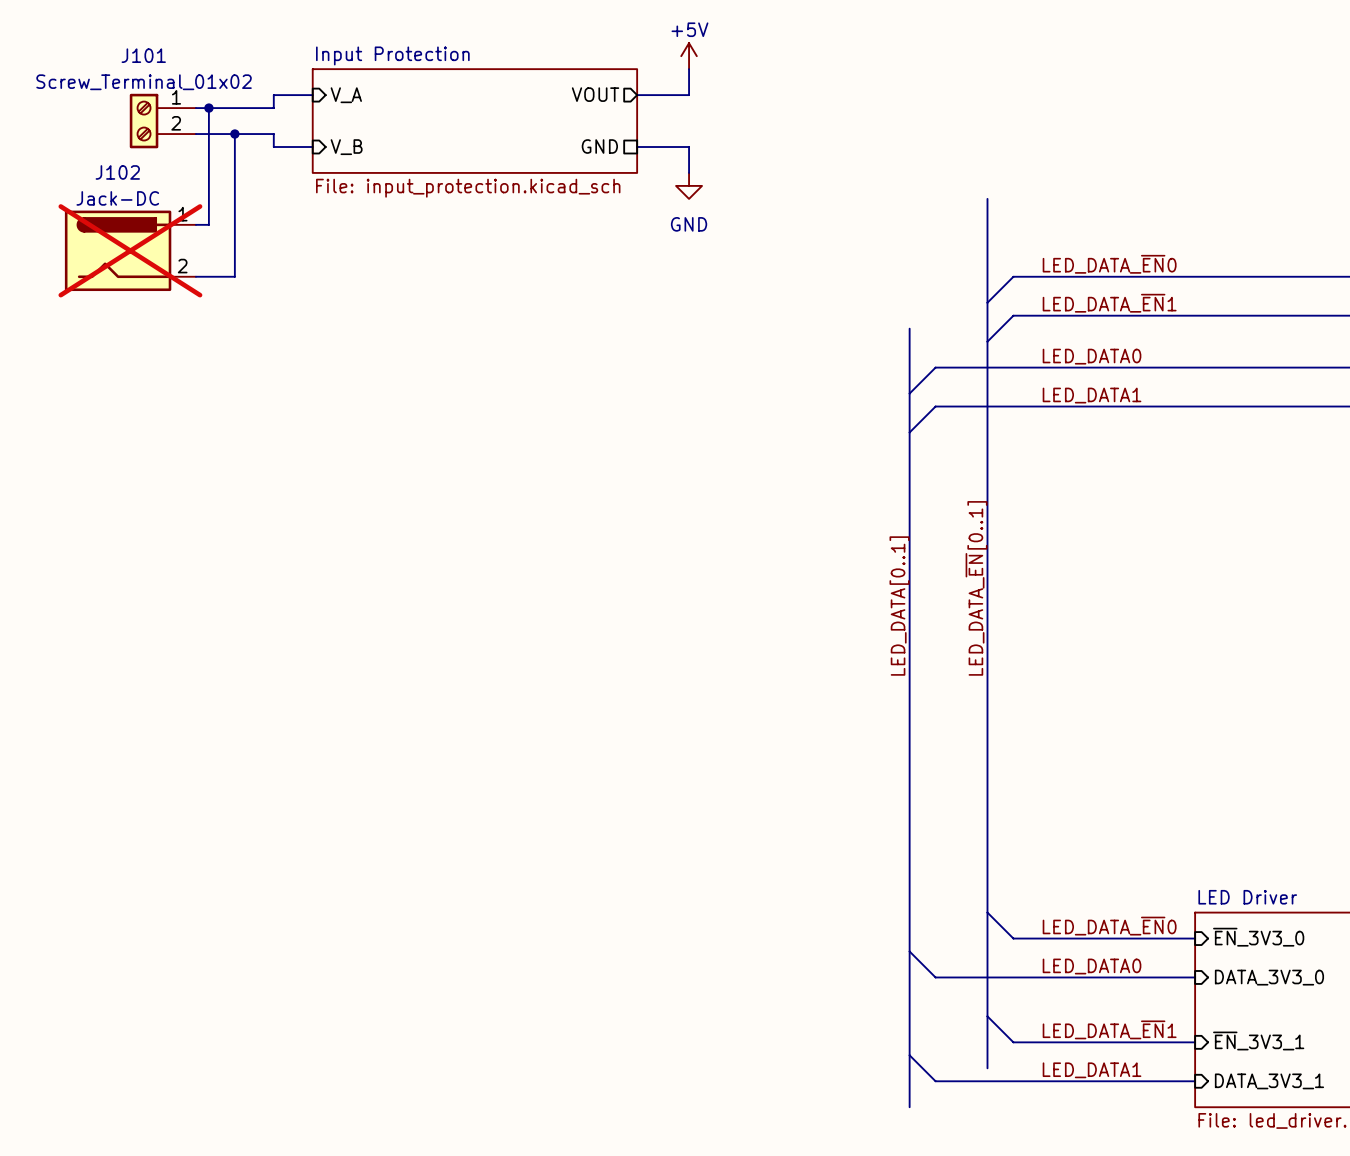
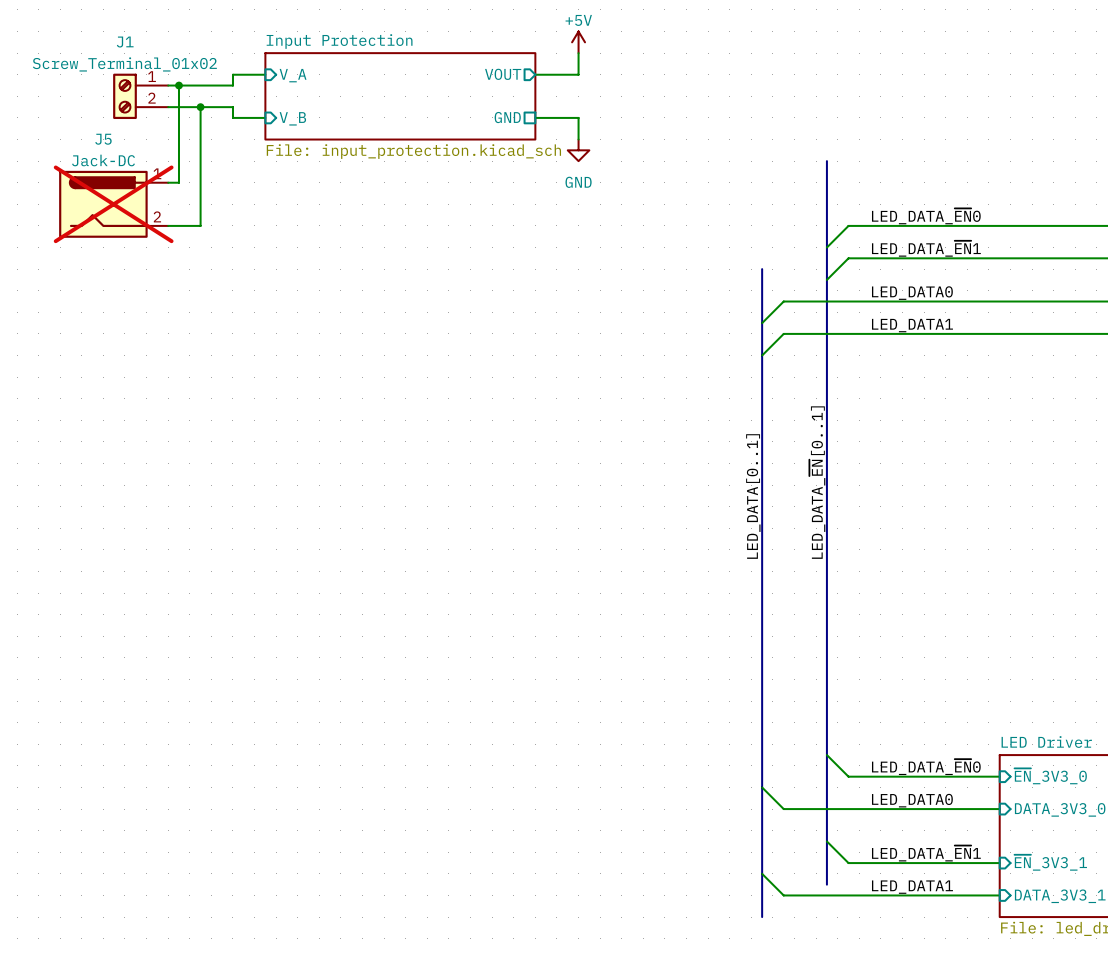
J101 name: J101 (143, 55) -> J1 (125, 42)
J102 name: J102 (117, 172) -> J5 (103, 139)

